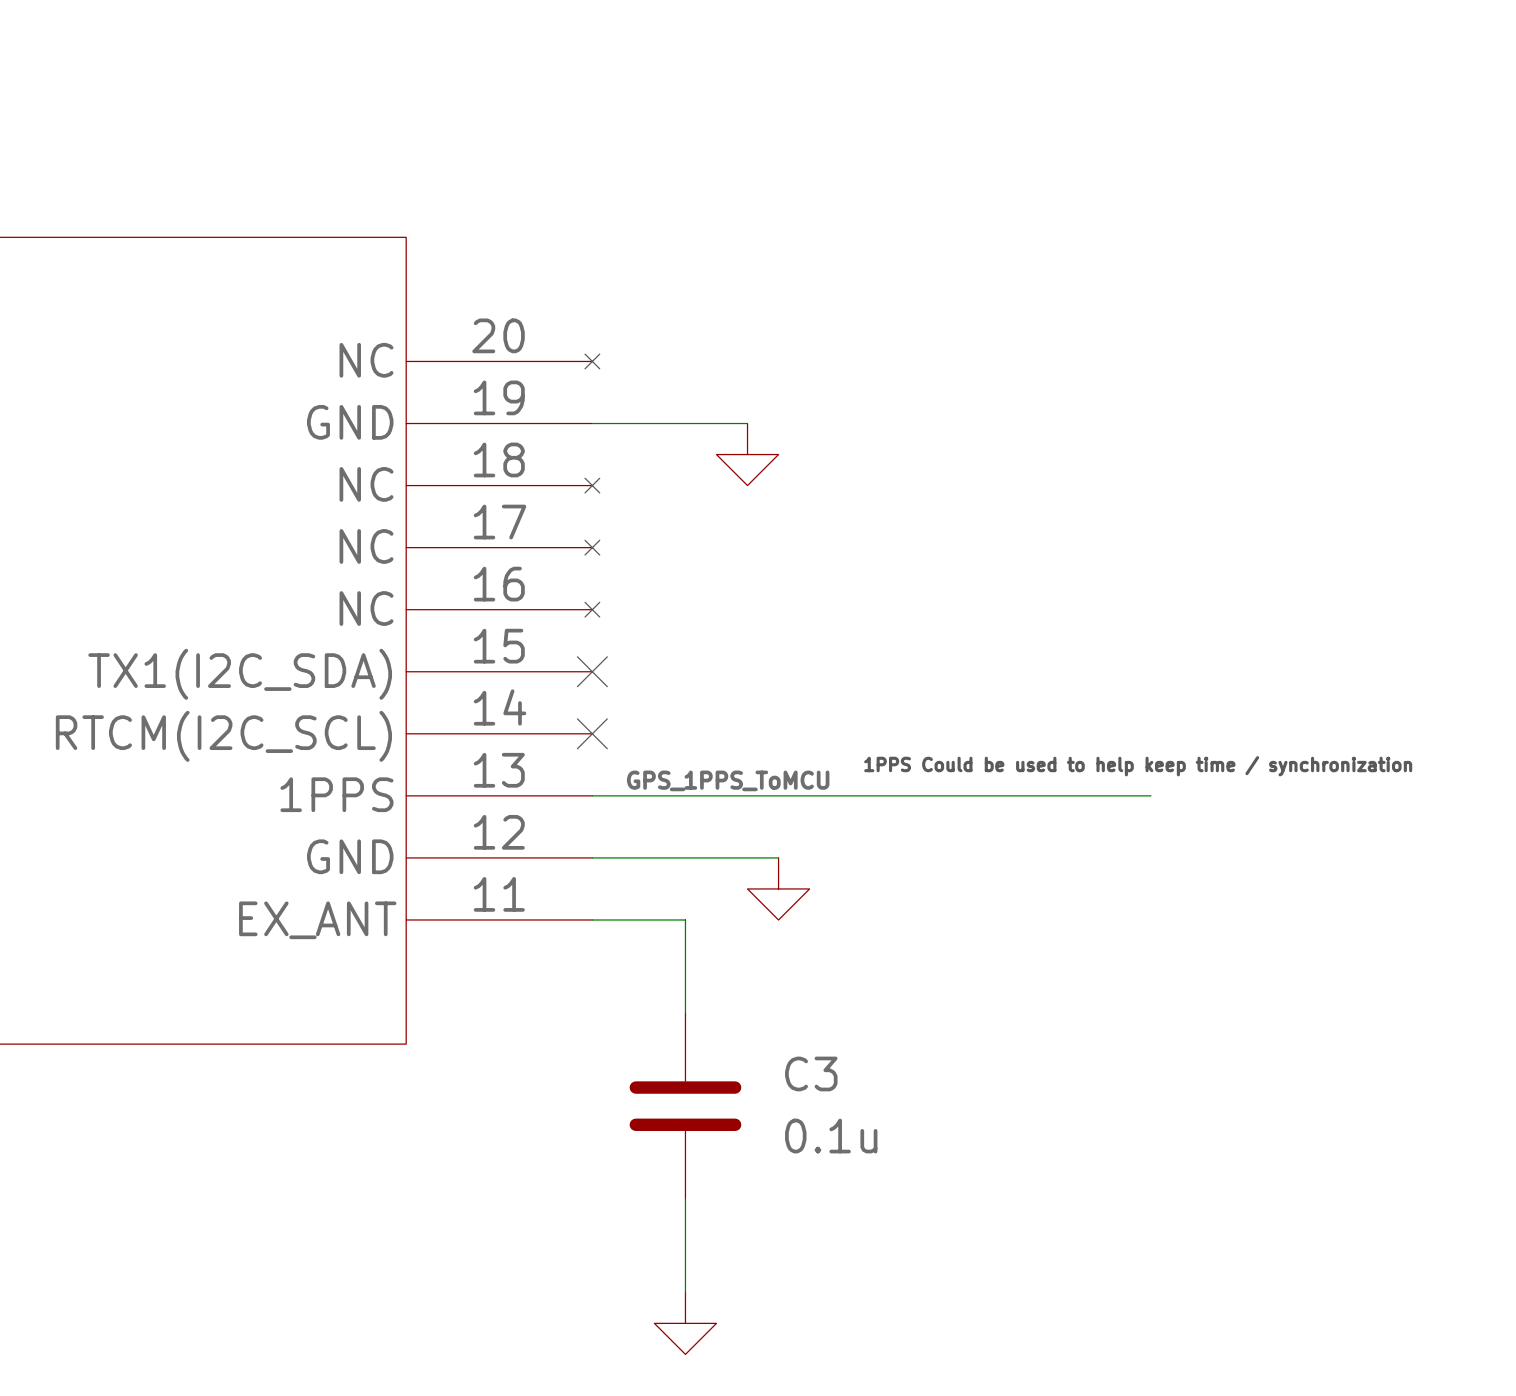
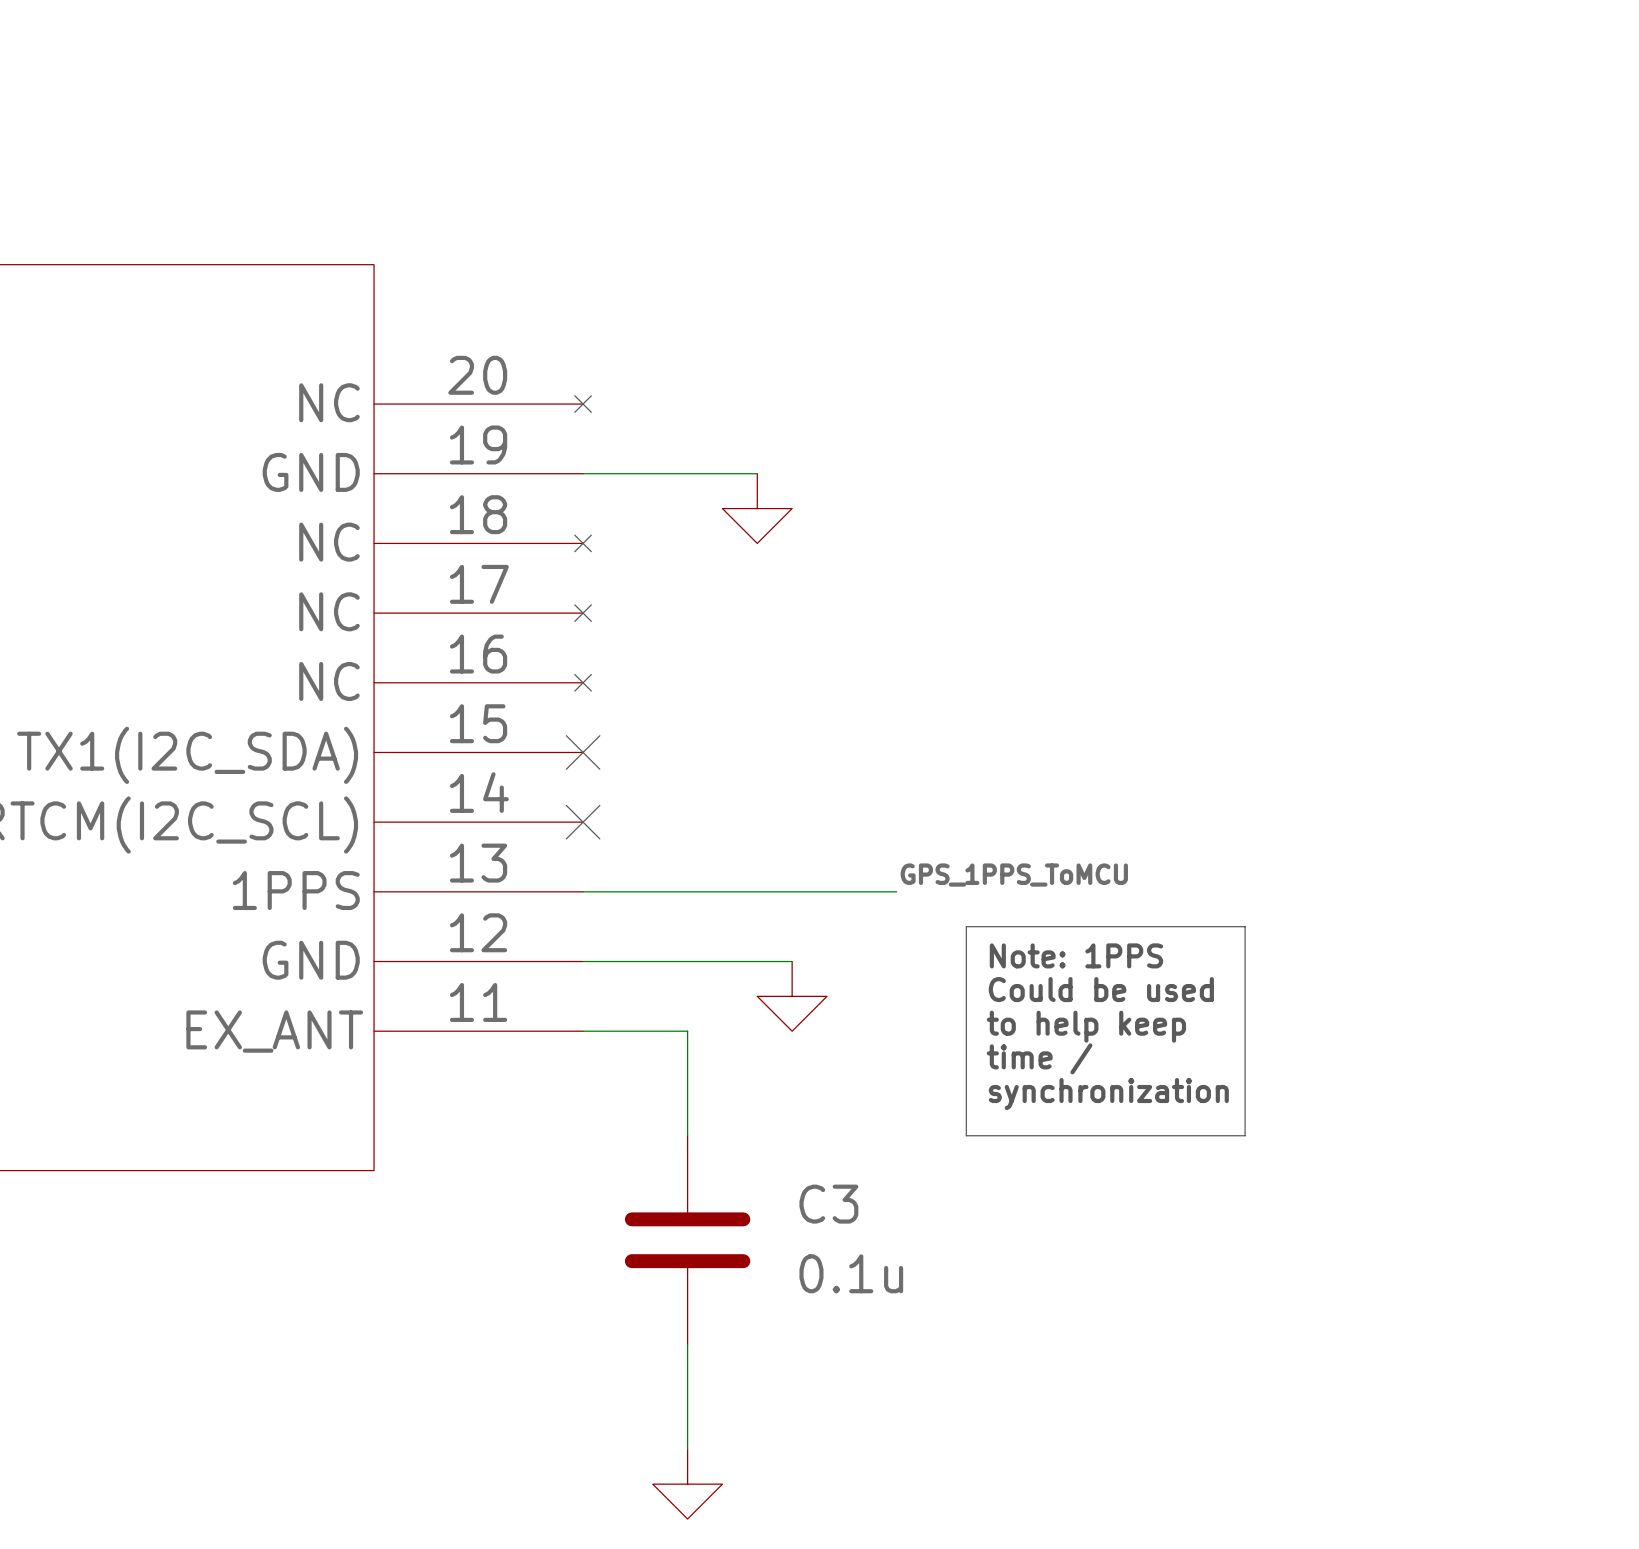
text: 1PPS Could be used to help keep time / synchronization (1138, 766) -> none
label position: GPS_1PPS_ToMCU (728, 780) -> GPS_1PPS_ToMCU (1014, 875)
wire: (871, 795) (1150, 795) -> none
line: none -> (966, 926) (1245, 926) (1245, 1135) (966, 1135) (966, 926)
text: none -> Note: 1PPS (1076, 955)
text: none -> Could be used (1101, 989)
text: none -> to help keep (1086, 1026)
text: none -> time / (1039, 1058)
text: none -> synchronization (1108, 1094)

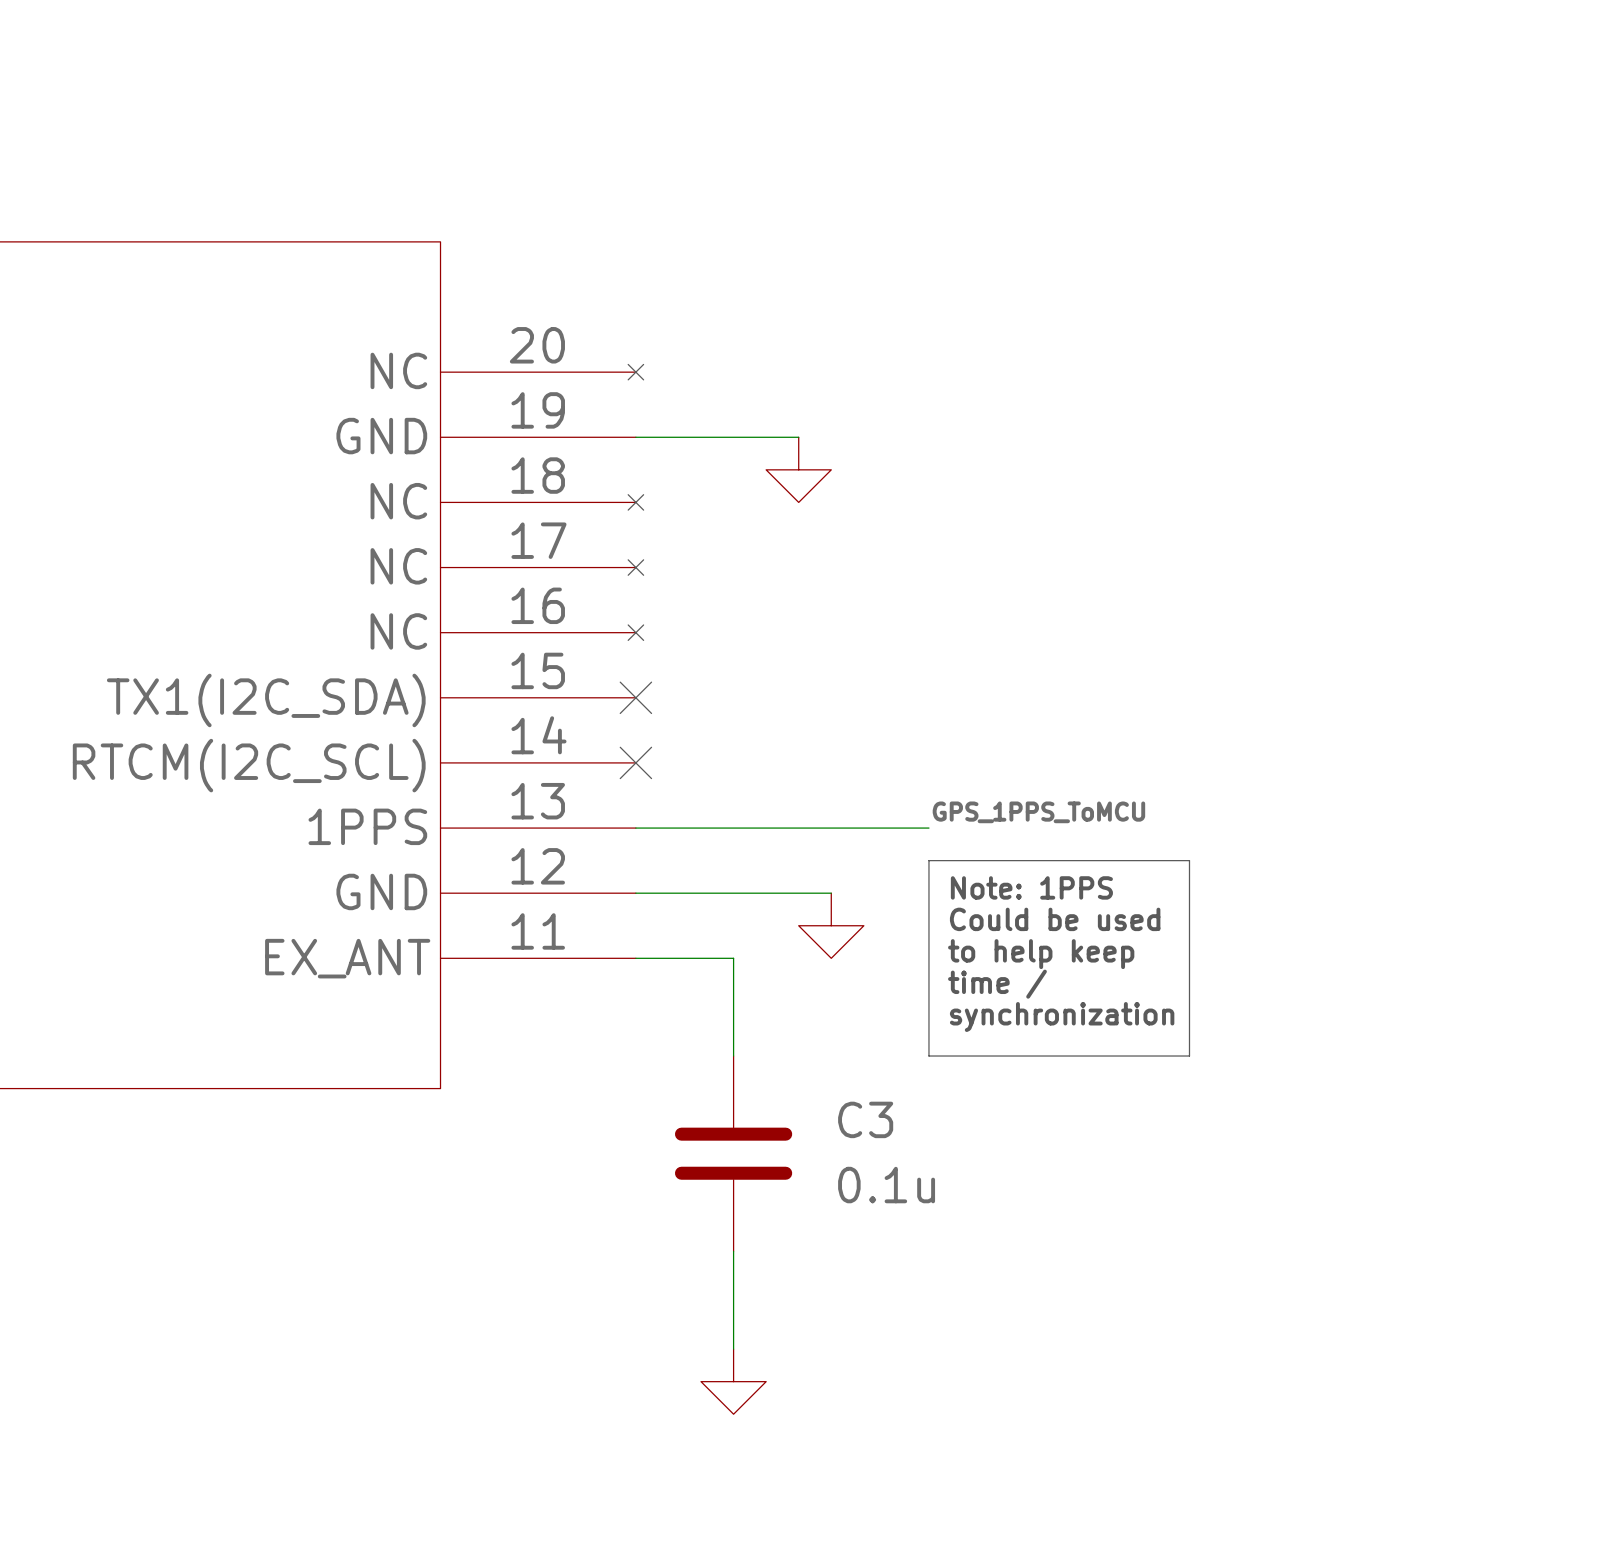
line: (966, 926) (966, 1135) -> (994, 860) (928, 860) (928, 1056) (994, 1056)
line: (1175, 926) (1245, 926) (1245, 1135) (1175, 1135) -> (1189, 860) (1189, 1056)
text position: Note: 1PPS (1076, 955) -> Note: 1PPS (1031, 887)
text position: Could be used (1101, 989) -> Could be used (1055, 919)
text position: to help keep (1086, 1026) -> to help keep (1041, 954)
text position: time / (1039, 1058) -> time / (997, 984)
text position: synchronization (1108, 1094) -> synchronization (1062, 1017)

